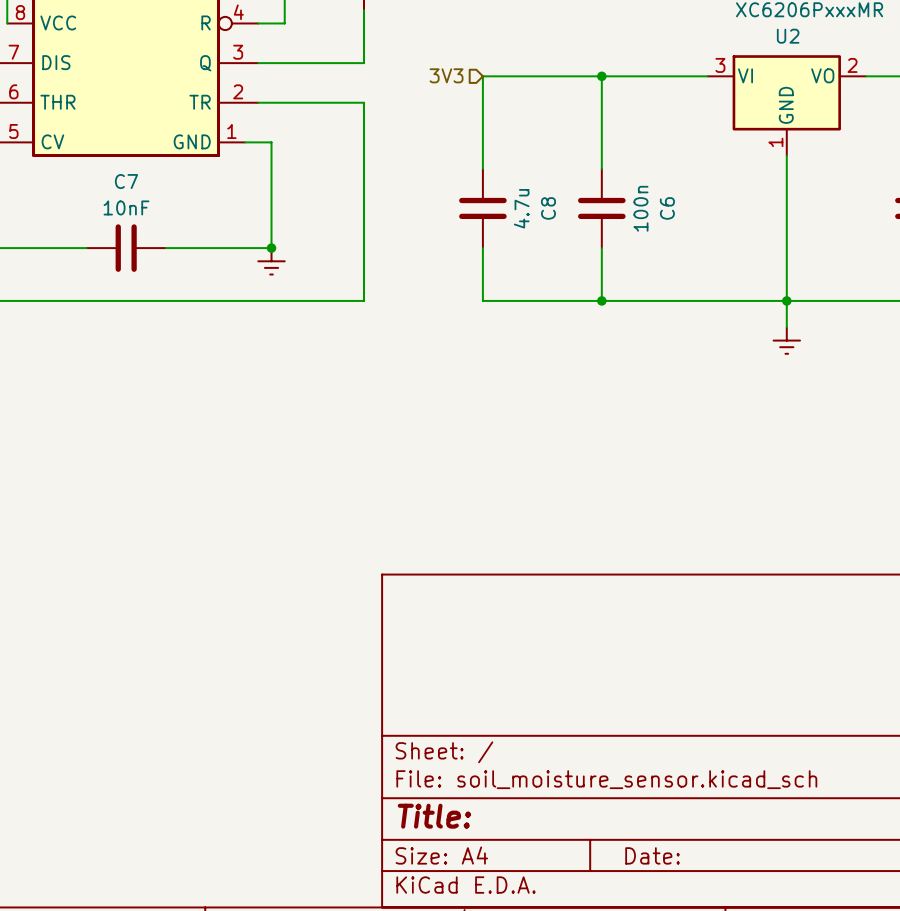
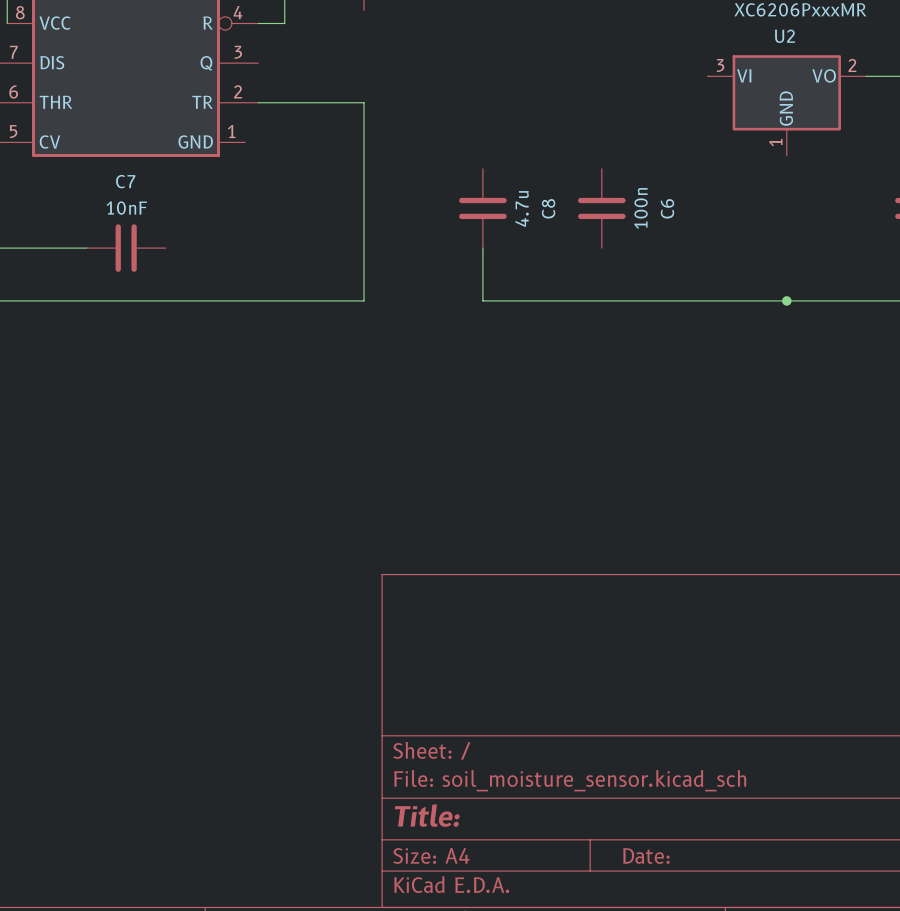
wire: (364, 10) (364, 63) (258, 63) -> none
hierarchical label: 3V3 (446, 75) -> none
wire: (601, 76) (601, 168) -> none
junction: (601, 76) -> none
wire: (707, 76) (482, 76) (482, 168) -> none
wire: (245, 142) (271, 142) (271, 248) (165, 248) -> none
wire: (786, 155) (786, 327) -> none
junction: (271, 248) -> none
wire: (601, 248) (601, 300) -> none
power symbol: (271, 261) -> none
junction: (601, 300) -> none
power symbol: (786, 340) -> none

